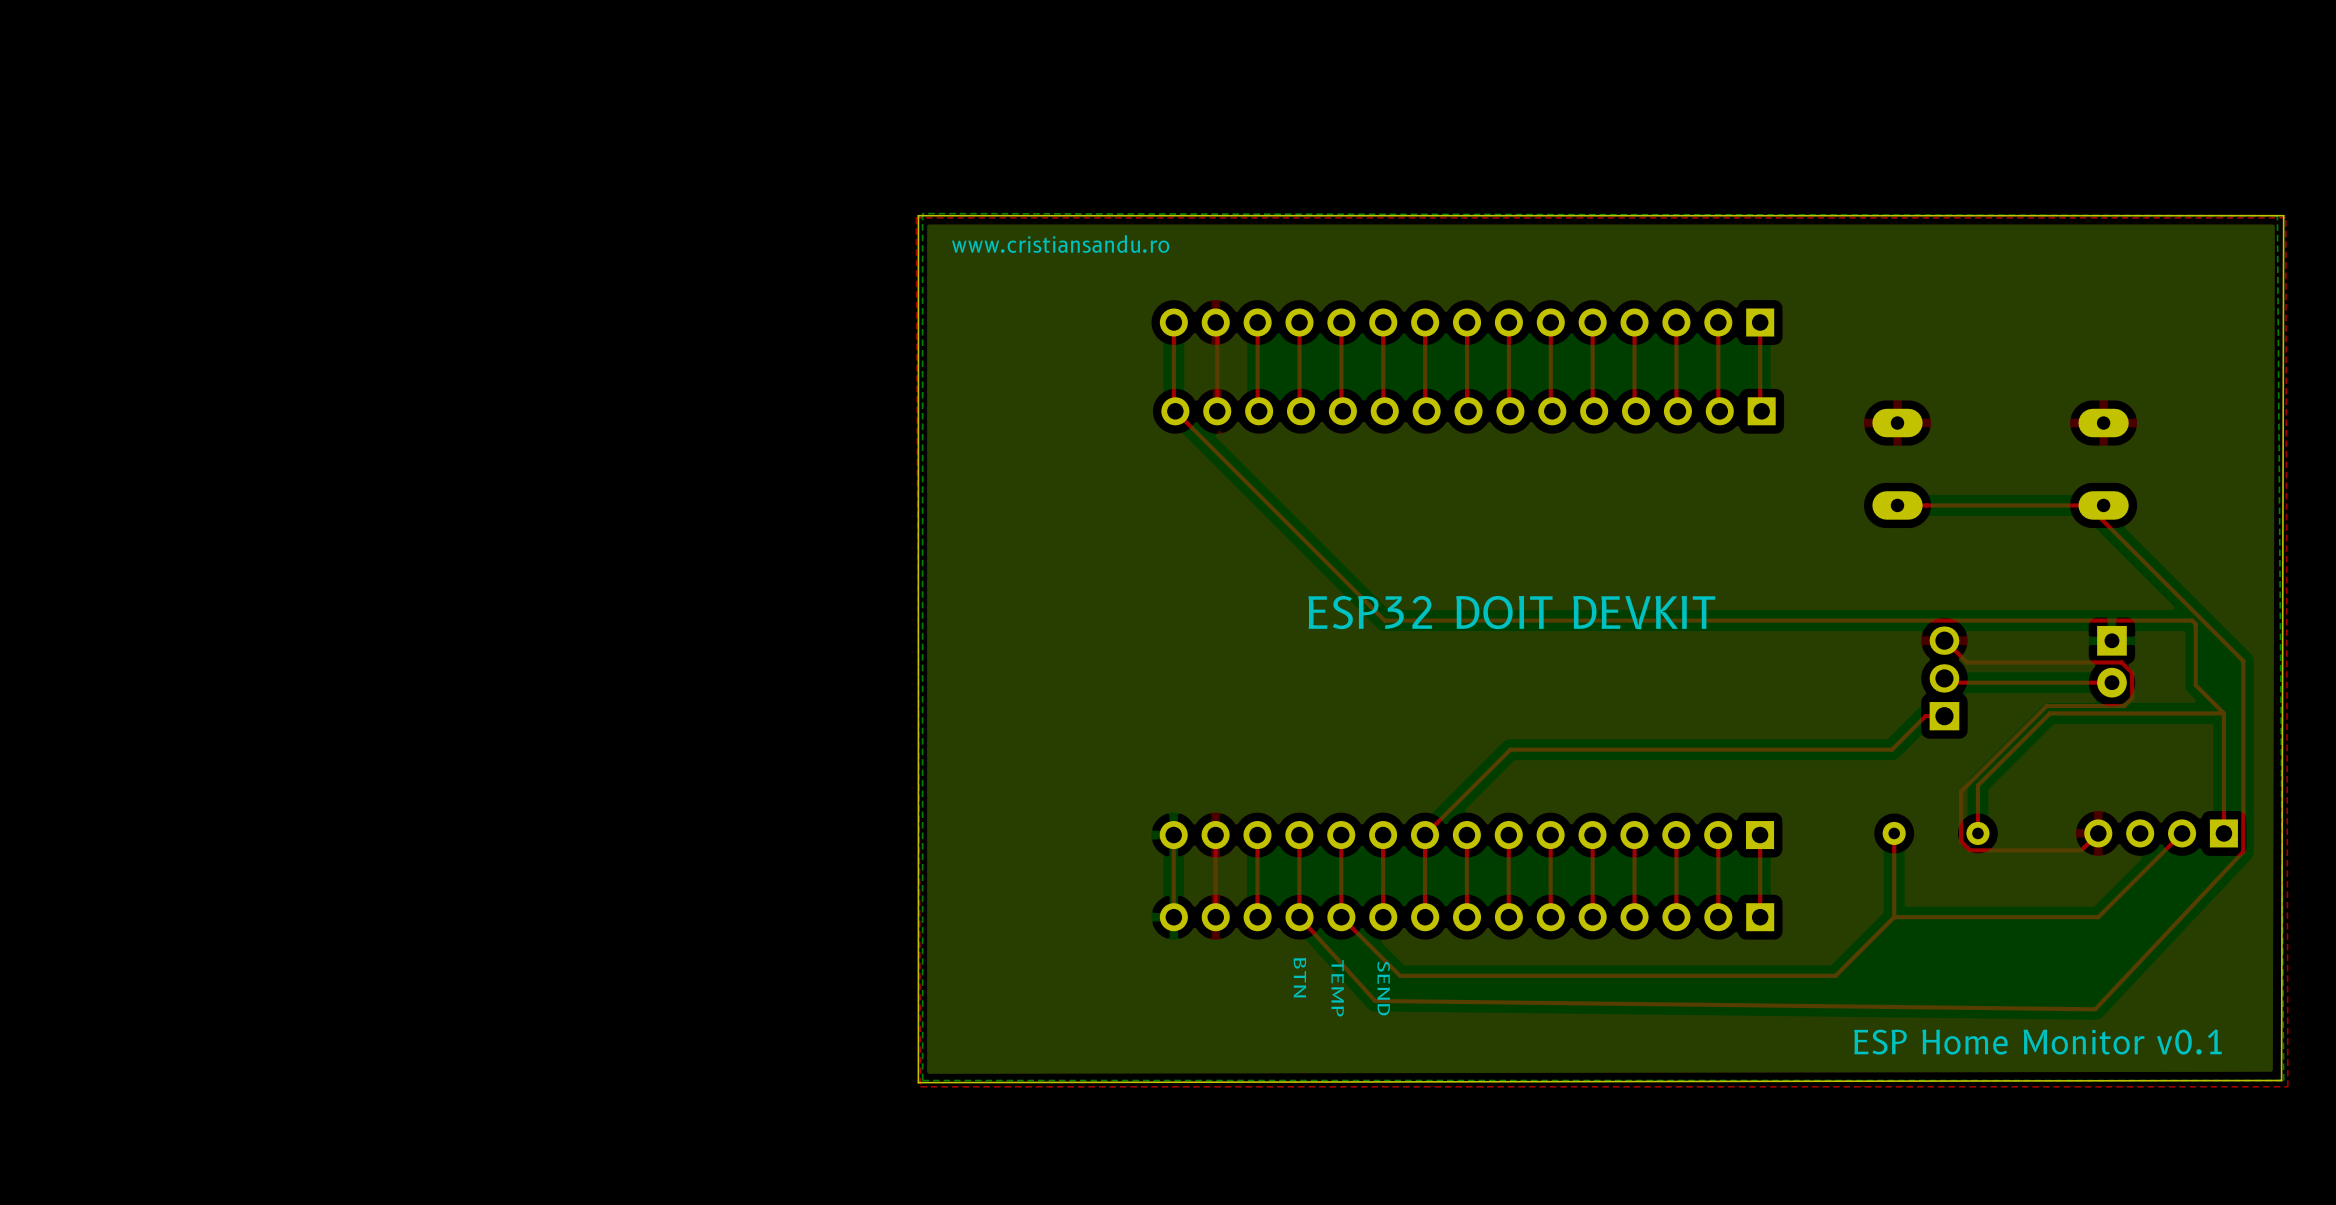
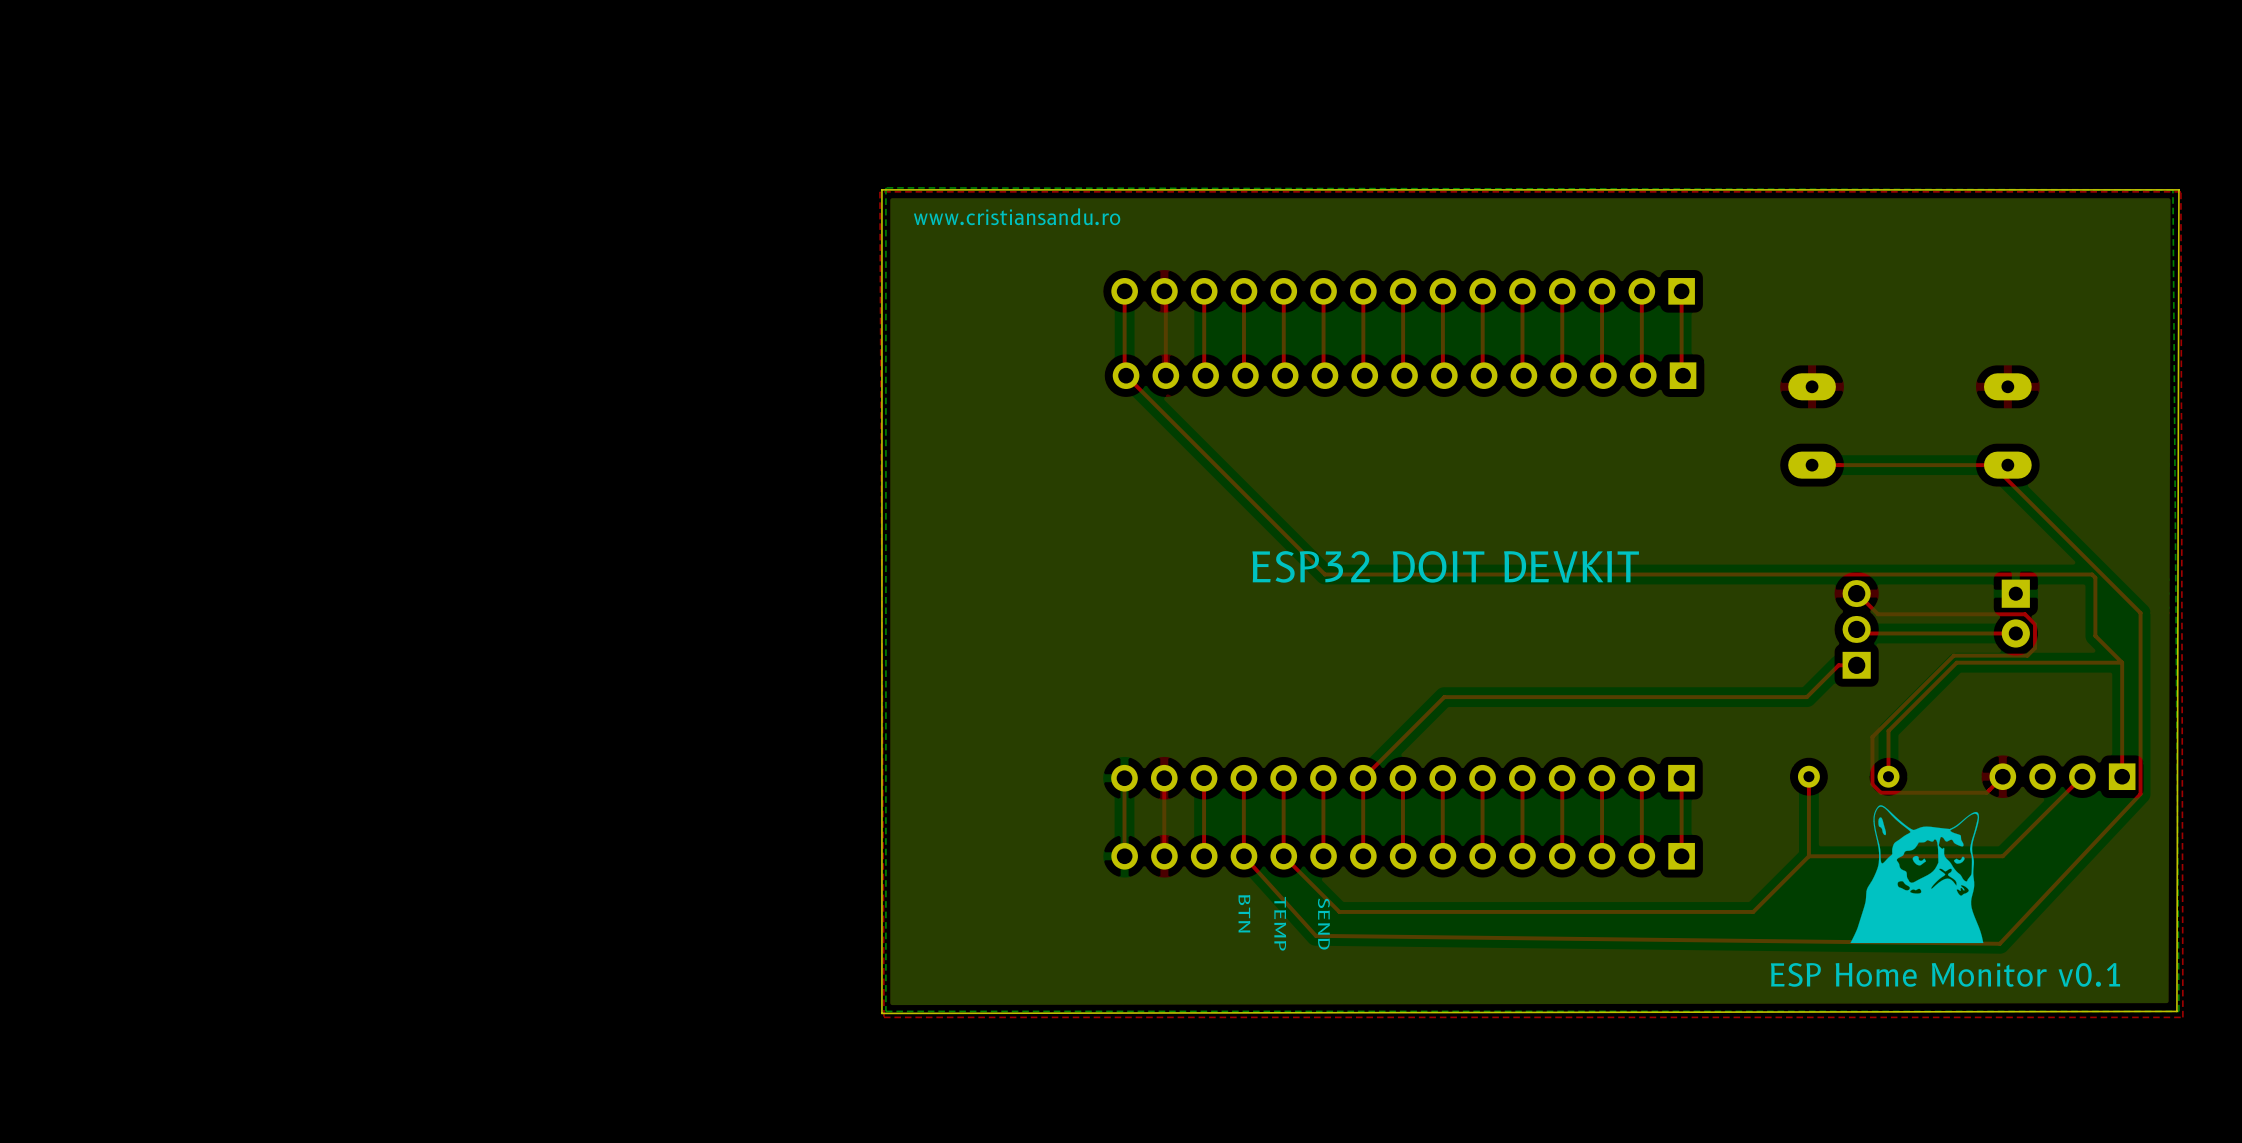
drawing: none -> [1850, 805, 1984, 944]

